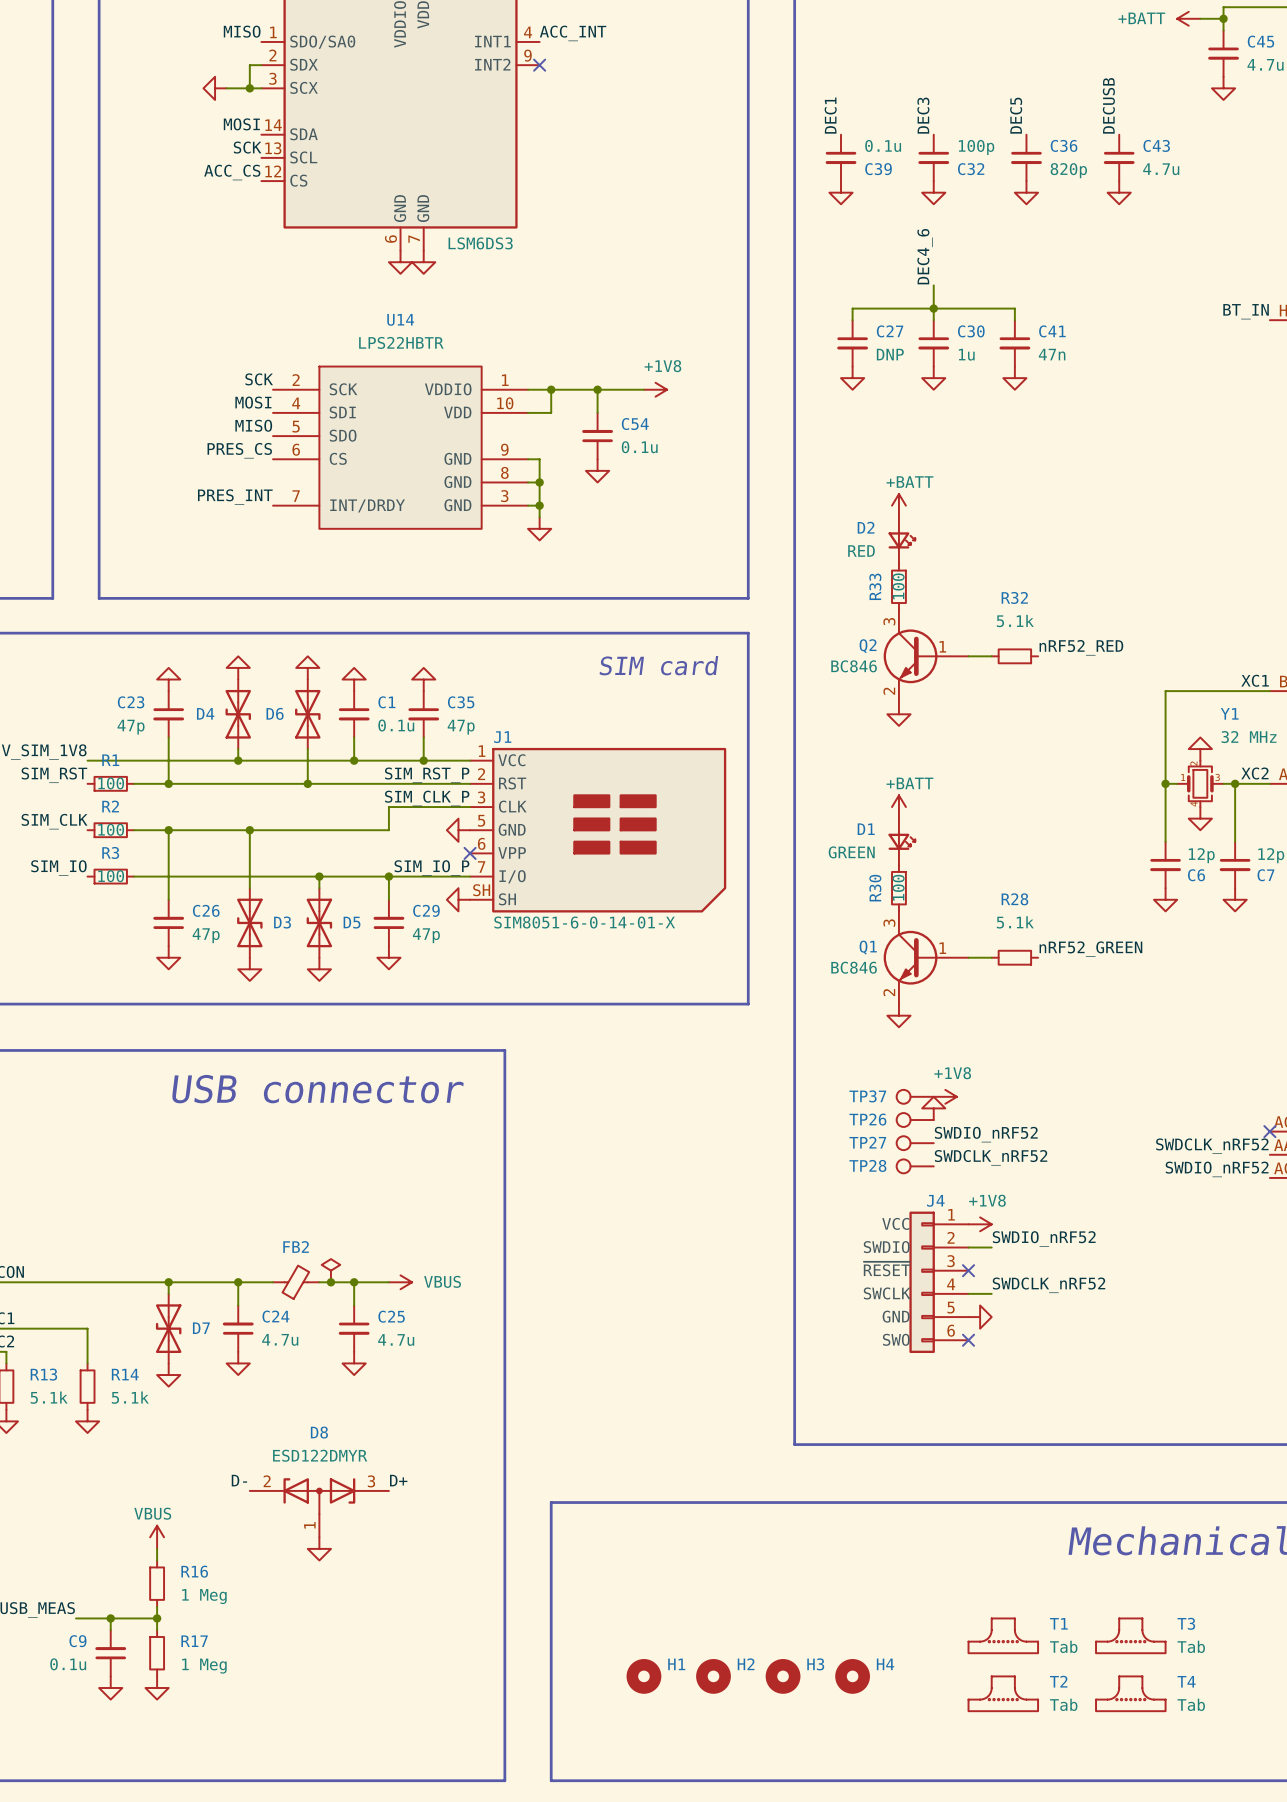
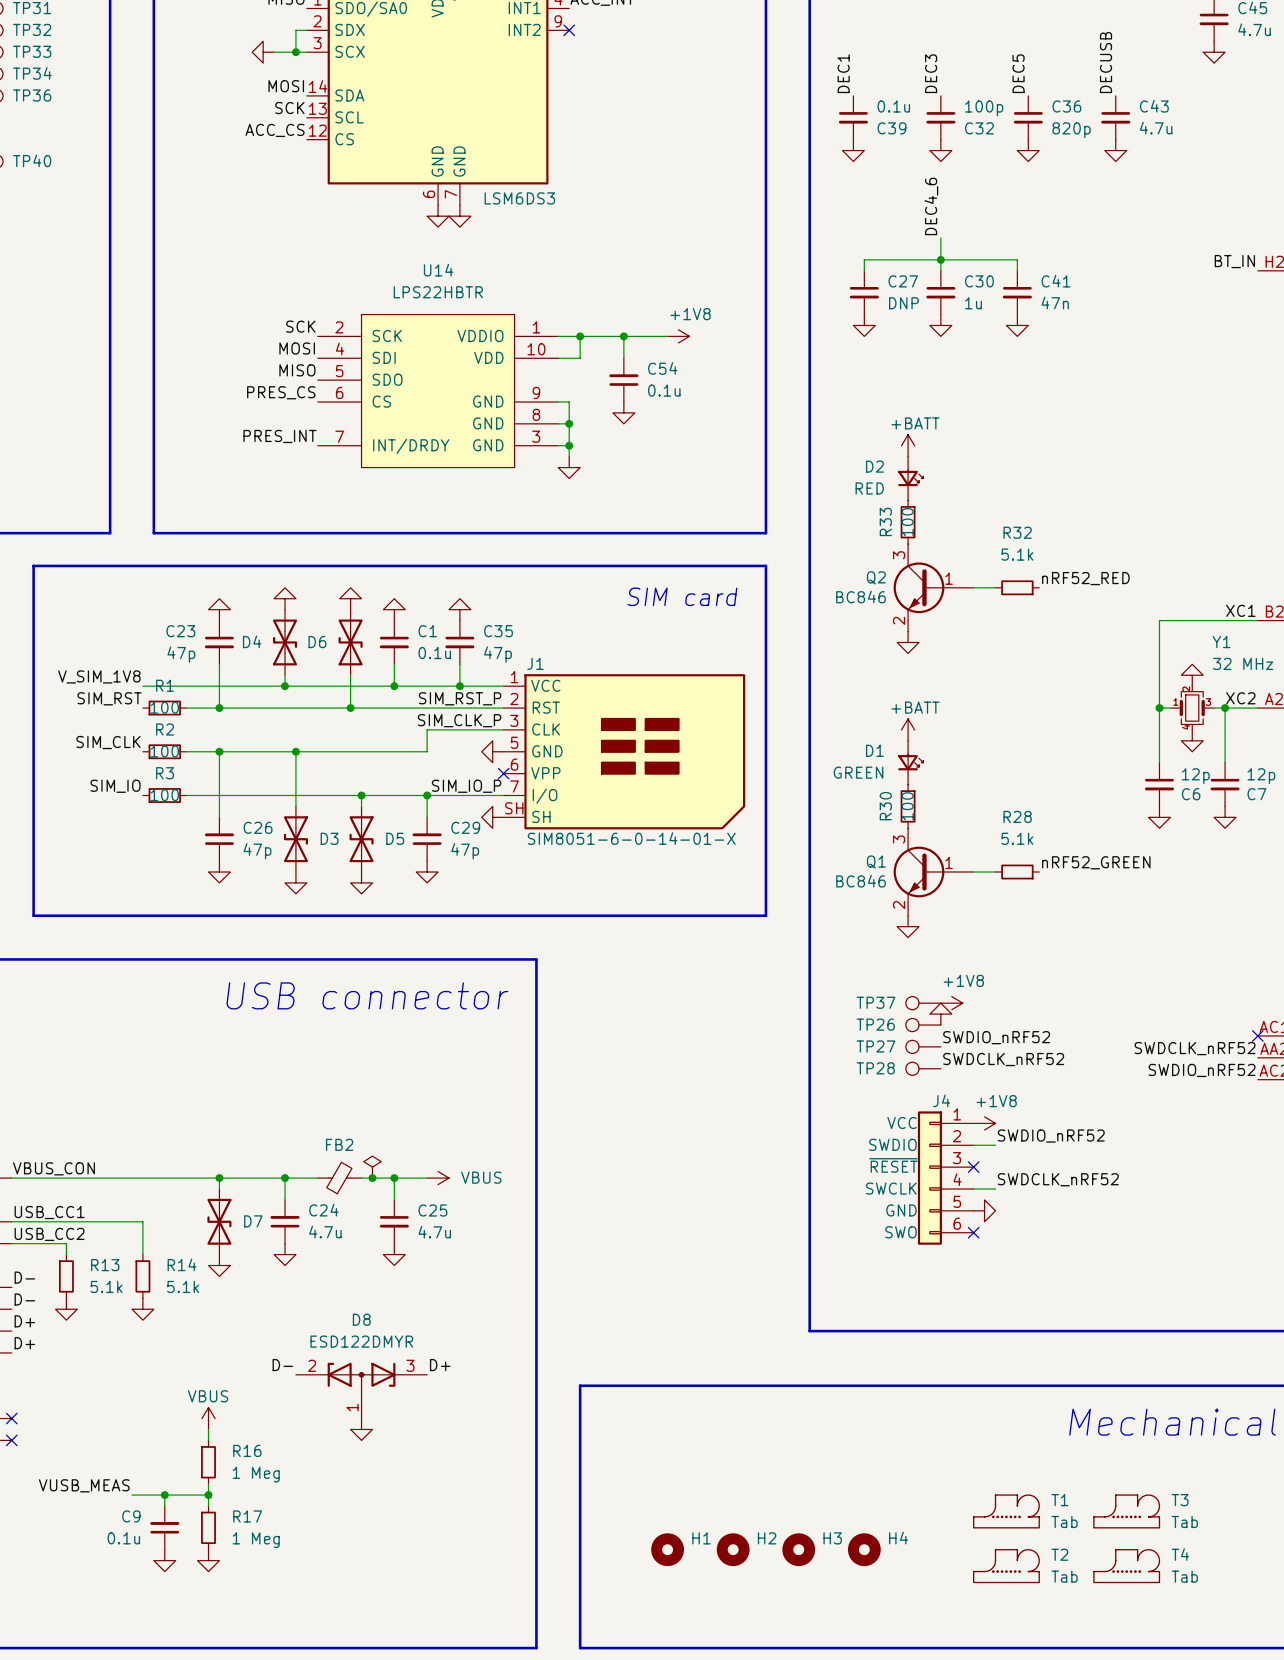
T1 symbol: [967, 1617, 1039, 1654] -> [972, 1494, 1040, 1529]
T3 symbol: [1095, 1617, 1167, 1654] -> [1093, 1494, 1161, 1529]
T2 symbol: [967, 1675, 1039, 1712] -> [972, 1549, 1040, 1584]
T4 symbol: [1095, 1675, 1167, 1712] -> [1093, 1549, 1161, 1584]

